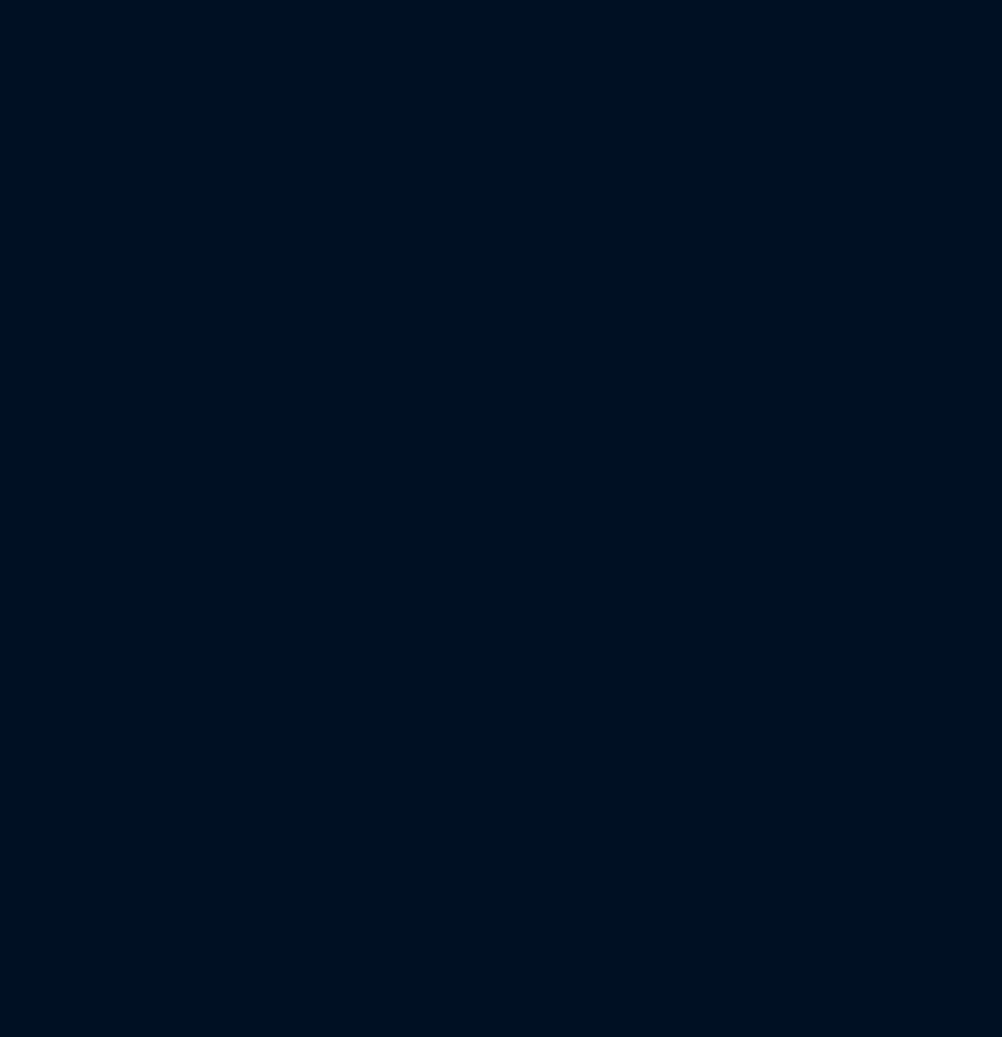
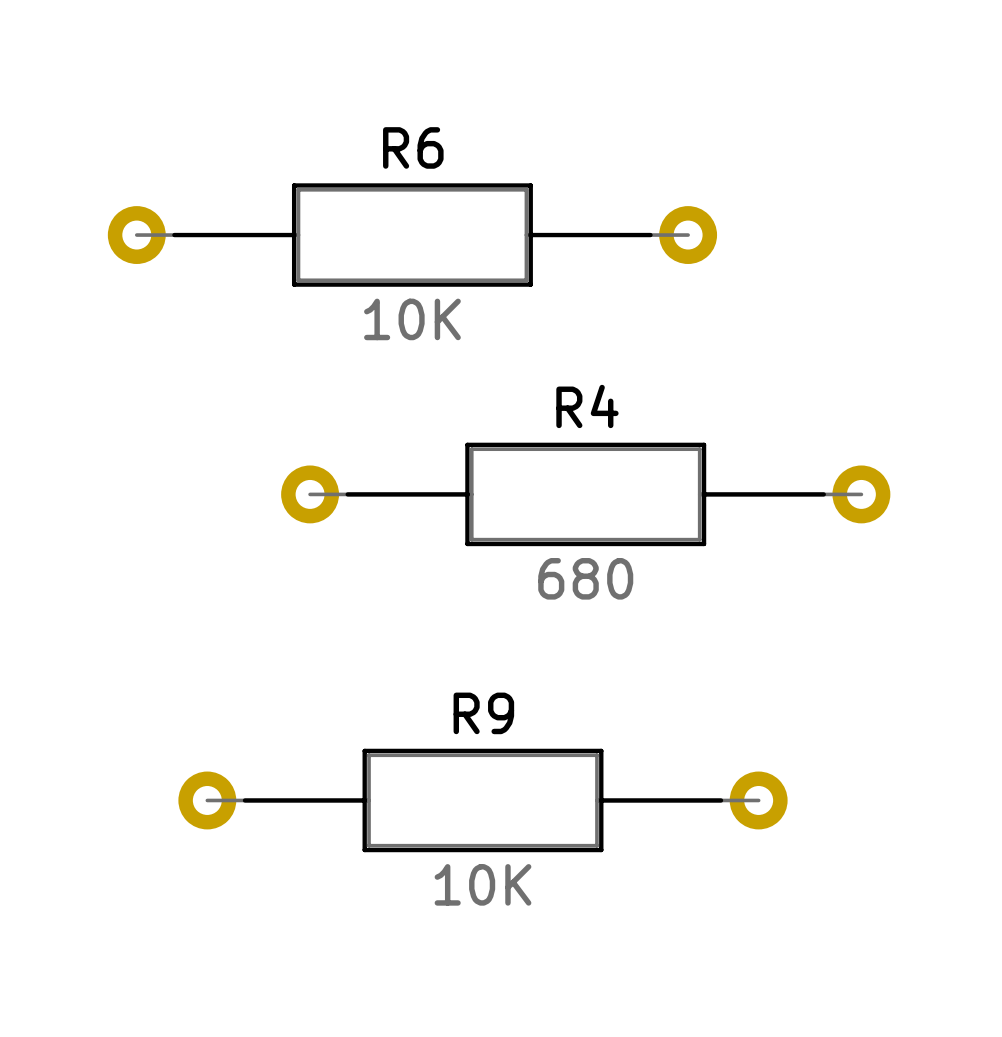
R6: none -> 10K (412, 235)
R4: none -> 680 (585, 494)
R9: none -> 10K (482, 800)

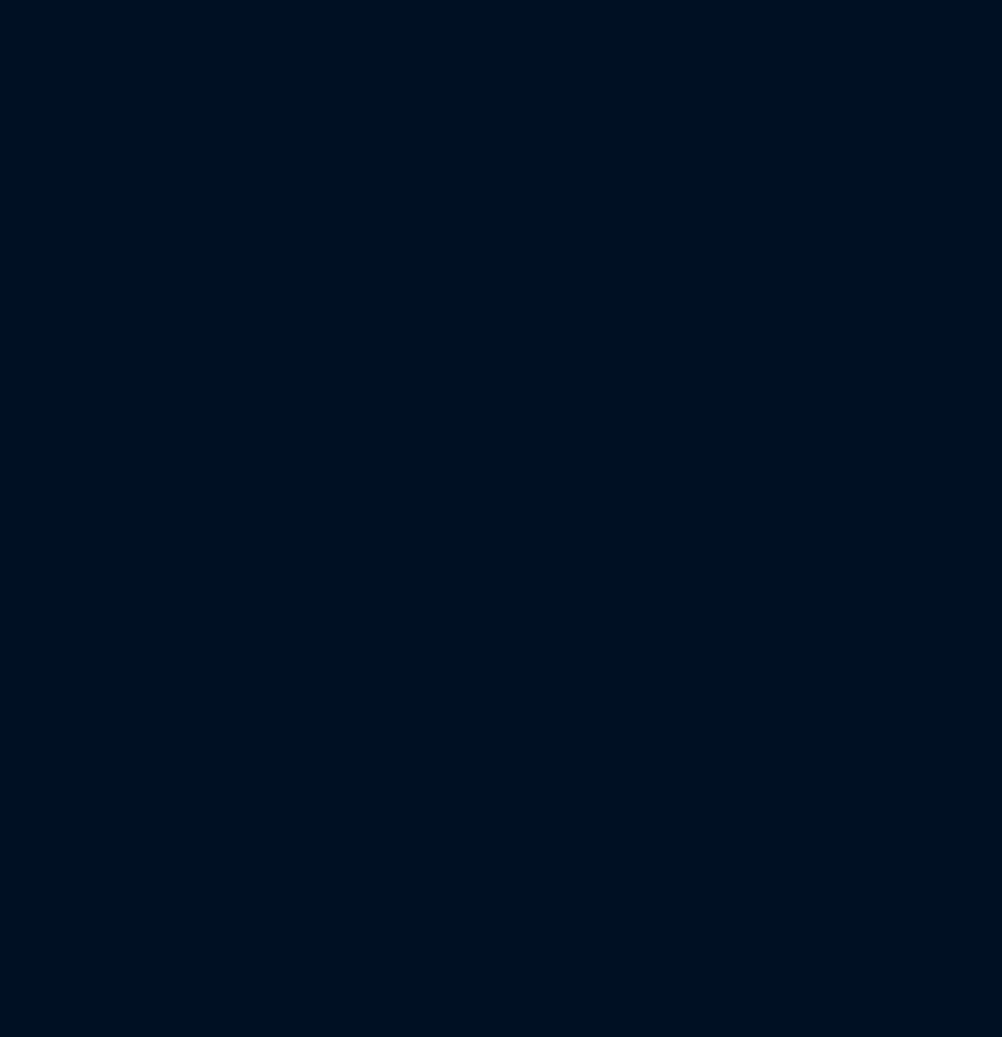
R6: 10K (412, 235) -> none
R4: 680 (585, 494) -> none
R9: 10K (482, 800) -> none

